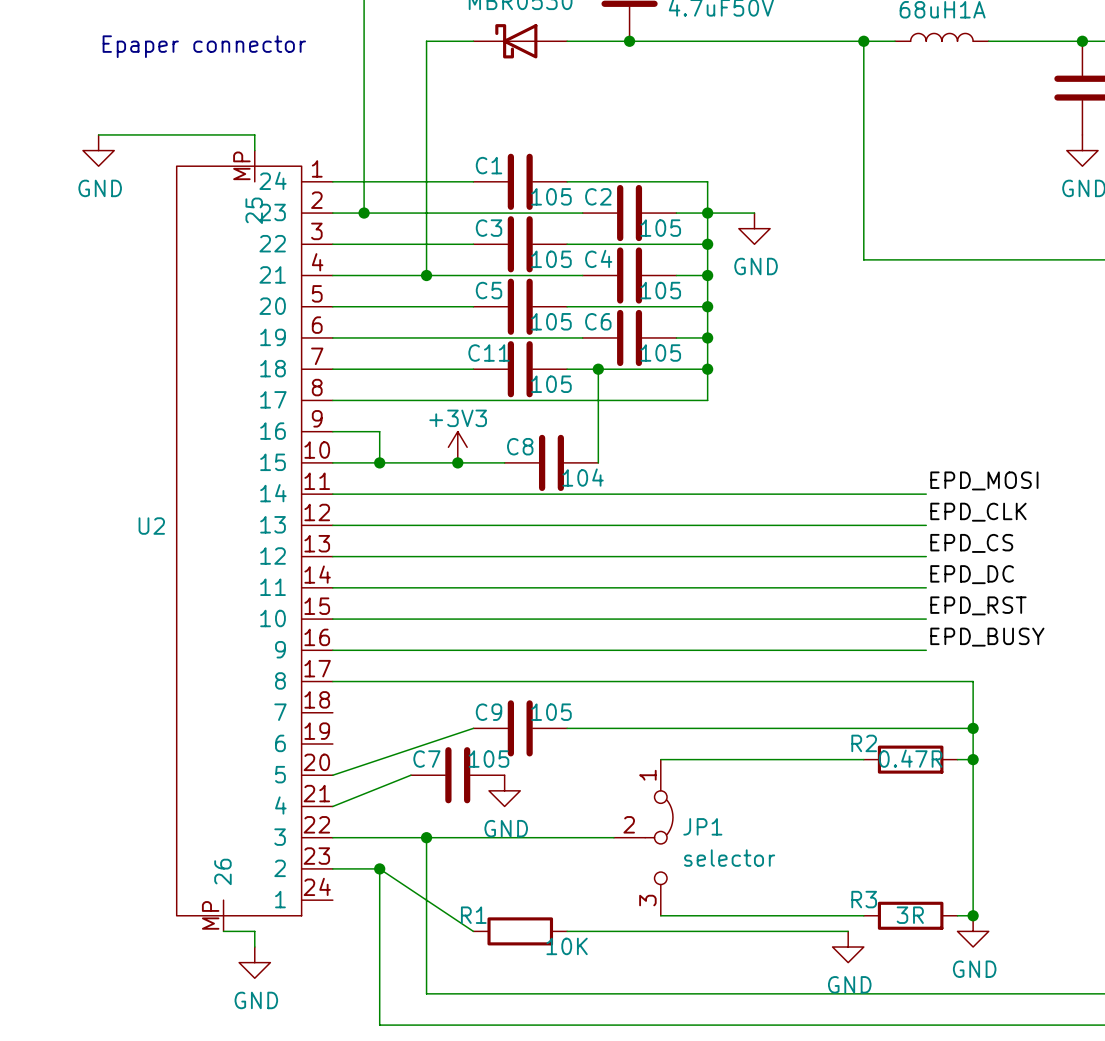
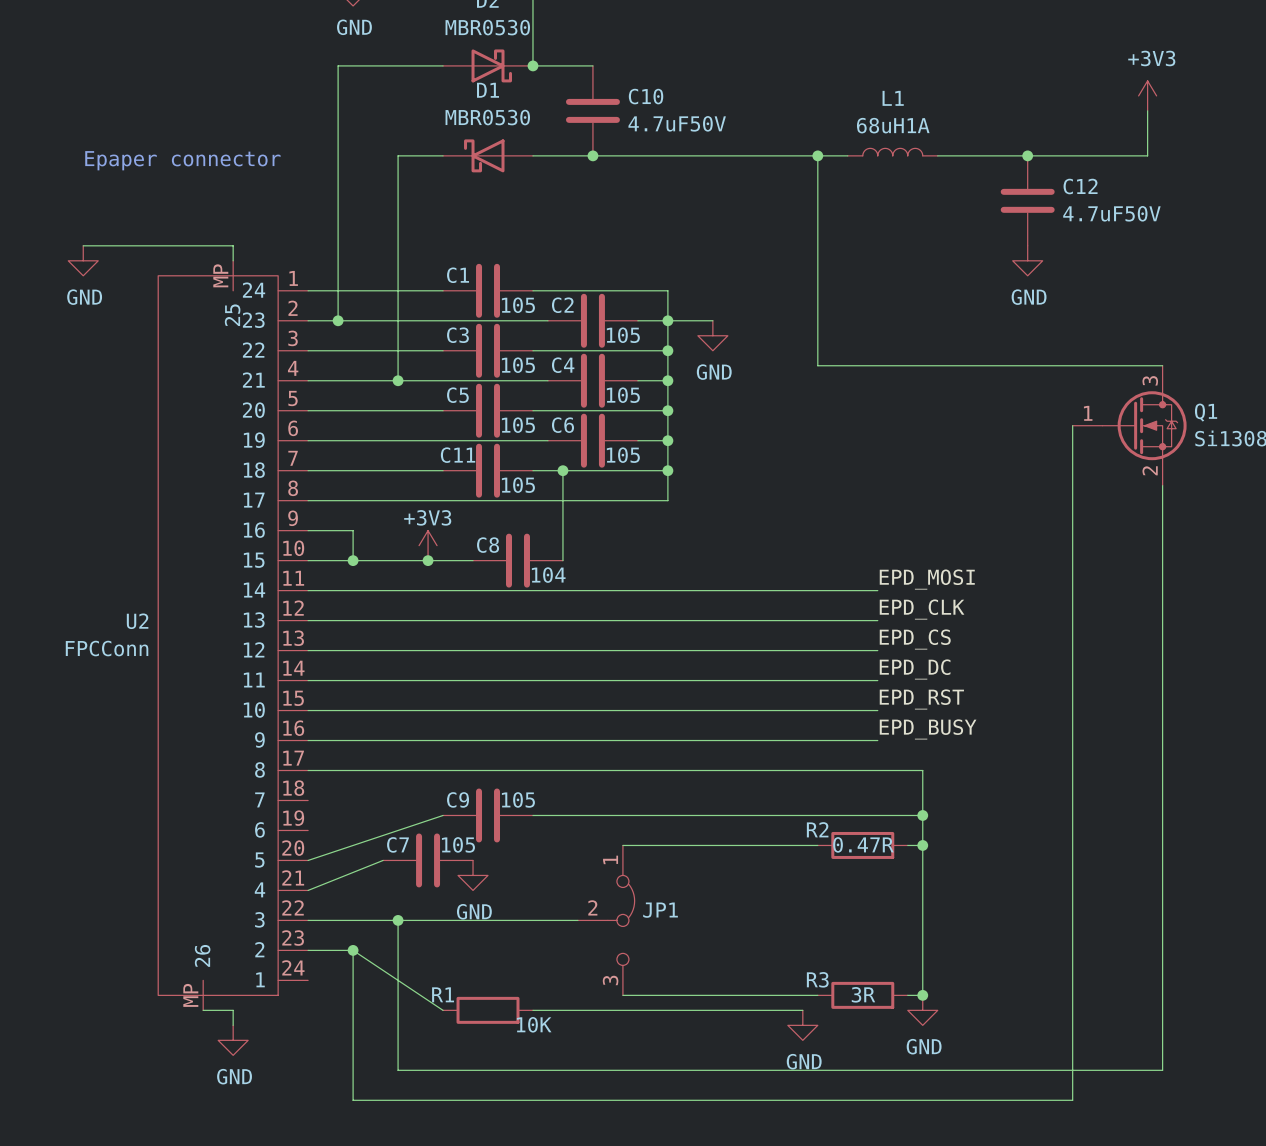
U2 value: none -> FPCConn (107, 648)
JP1 value: selector (729, 858) -> none

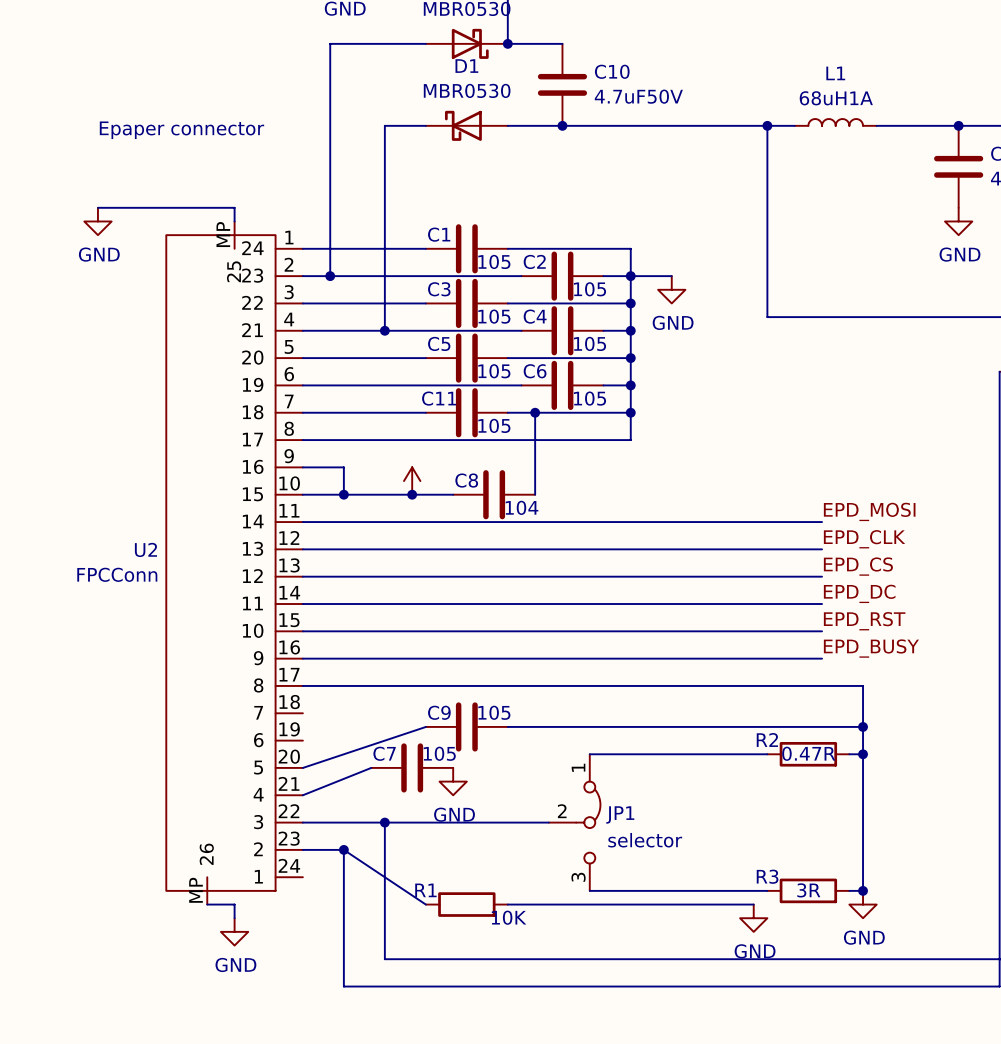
power symbol text: +3V3 (427, 517) -> none
JP1 value: none -> selector (645, 840)

